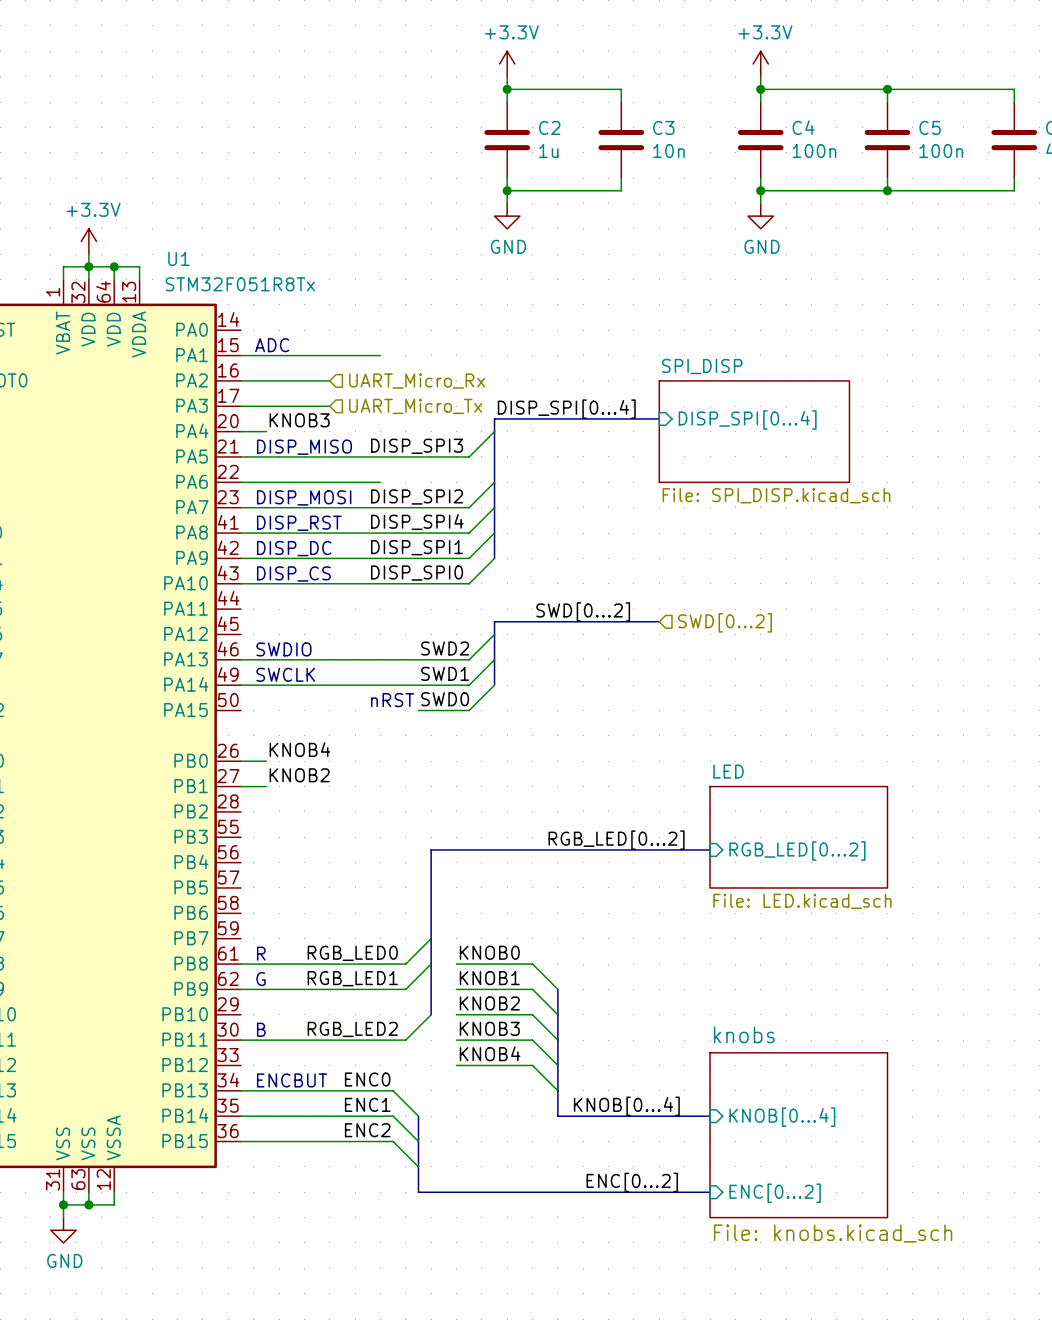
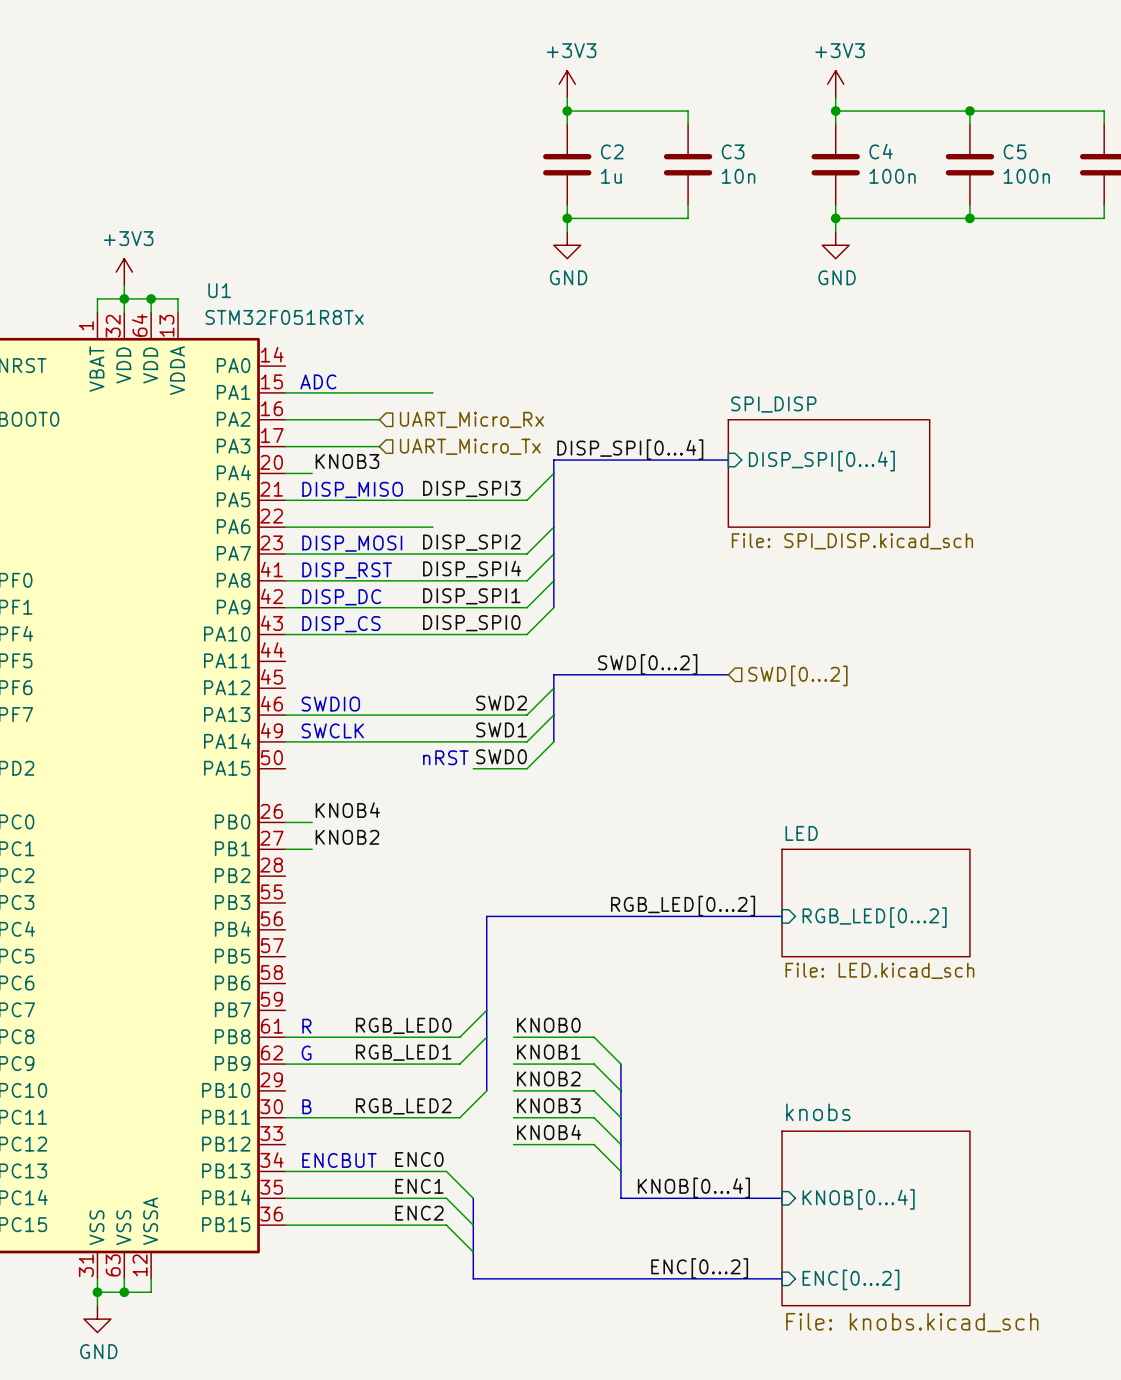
power symbol: +3.3V (507, 64) -> +3V3 (567, 84)
power symbol: +3.3V (760, 64) -> +3V3 (835, 84)
power symbol: +3.3V (88, 241) -> +3V3 (124, 272)

